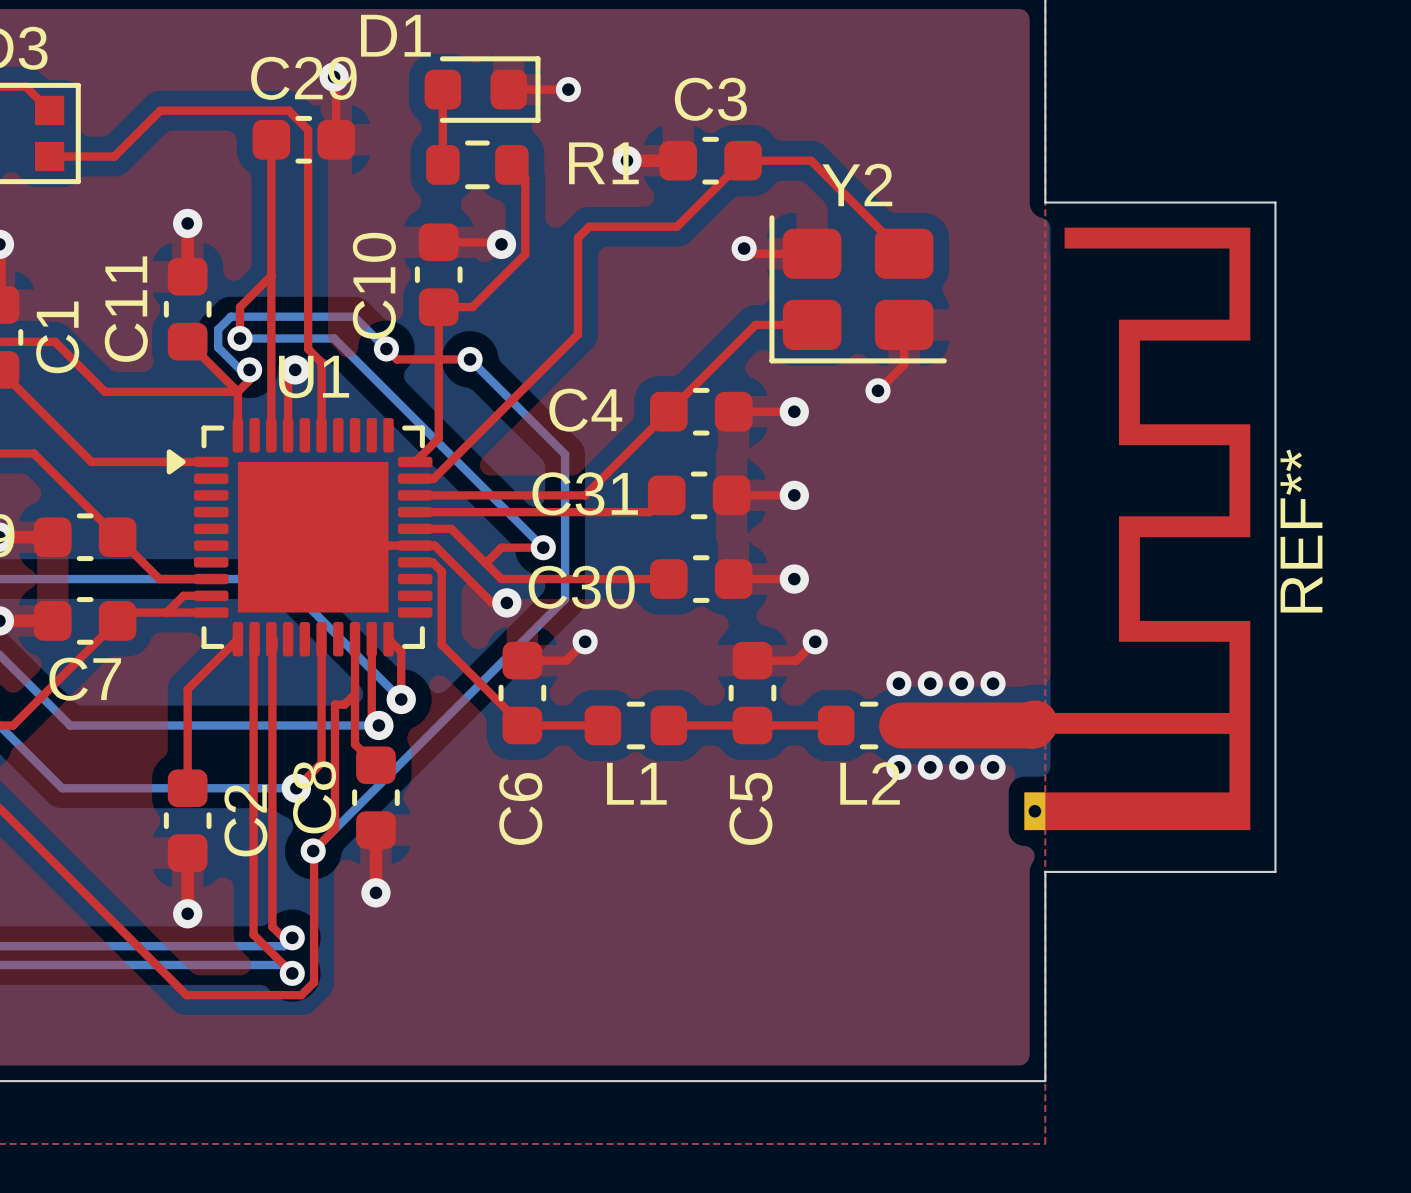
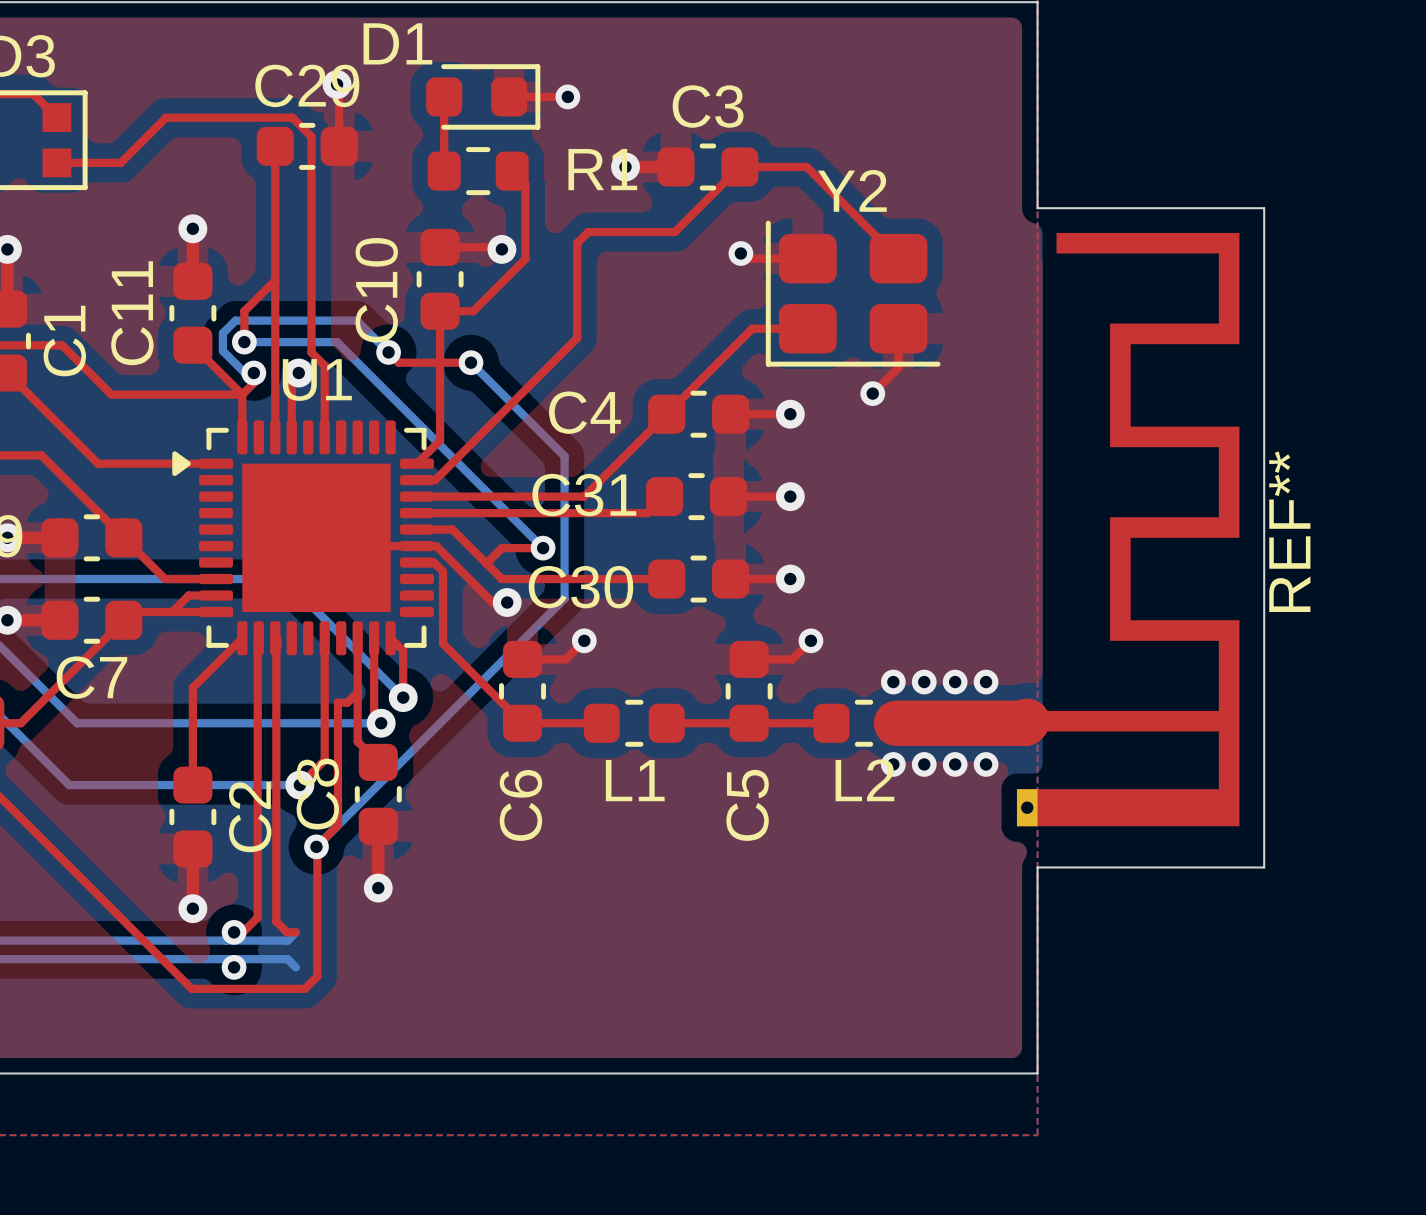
top track: (253, 922) (253, 934) (292, 973) -> (257, 917) (242, 932) (234, 932)
via: none -> (234, 932)
via: (292, 937) -> none
via: none -> (234, 967)
via: (292, 973) -> none

